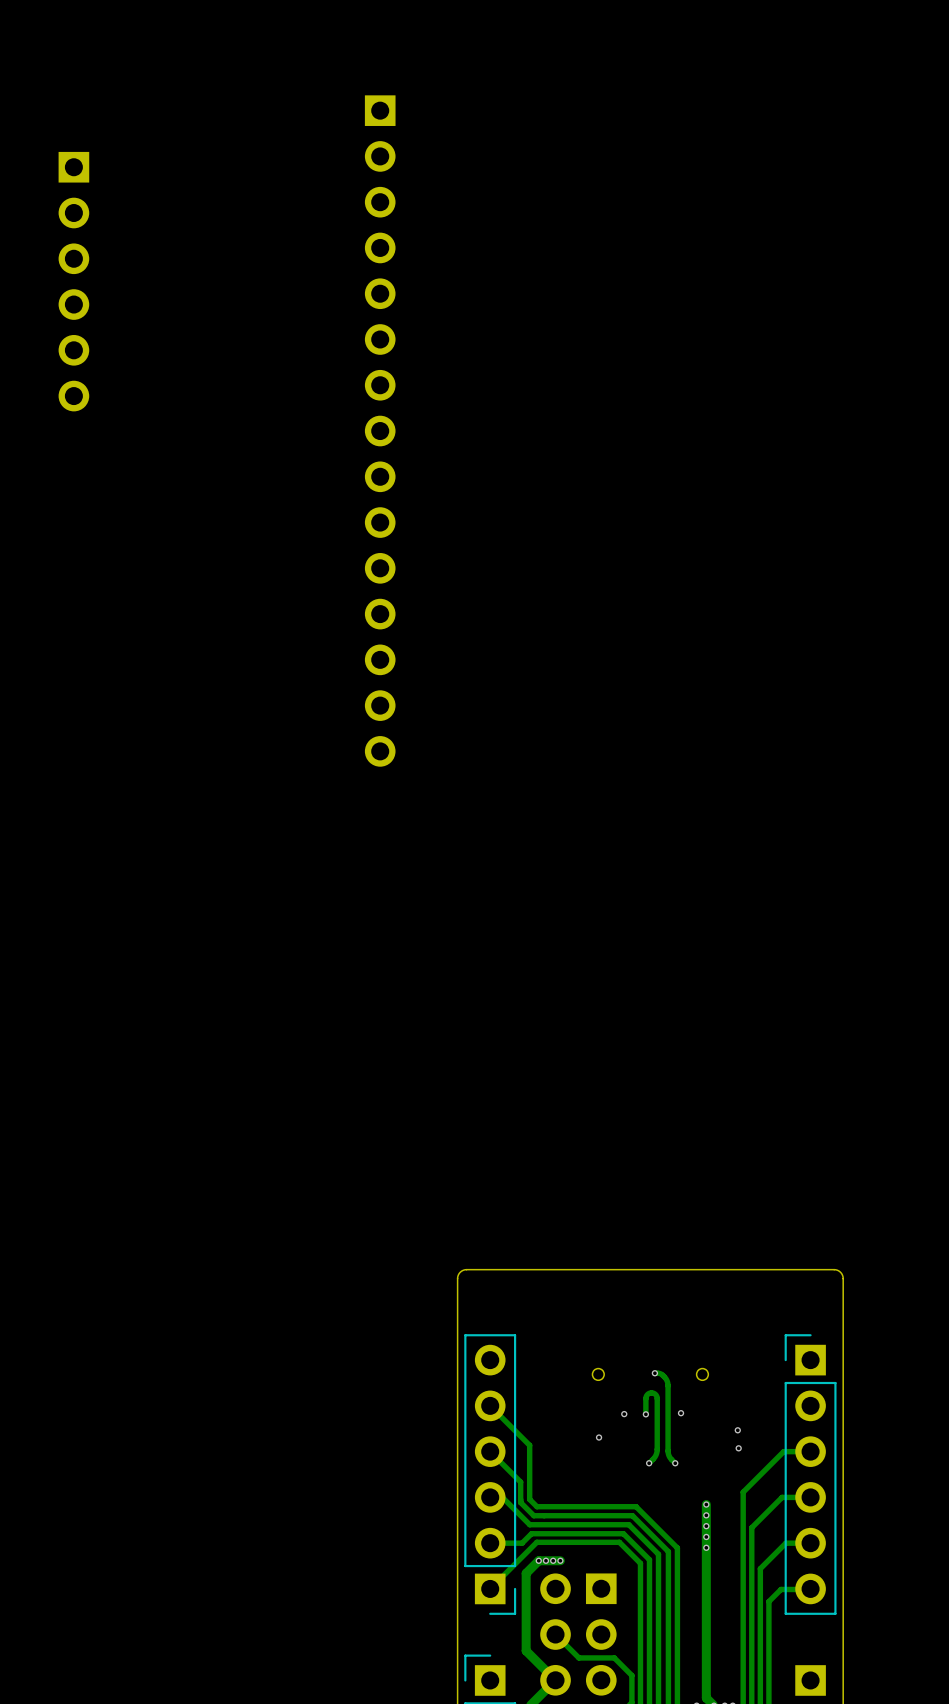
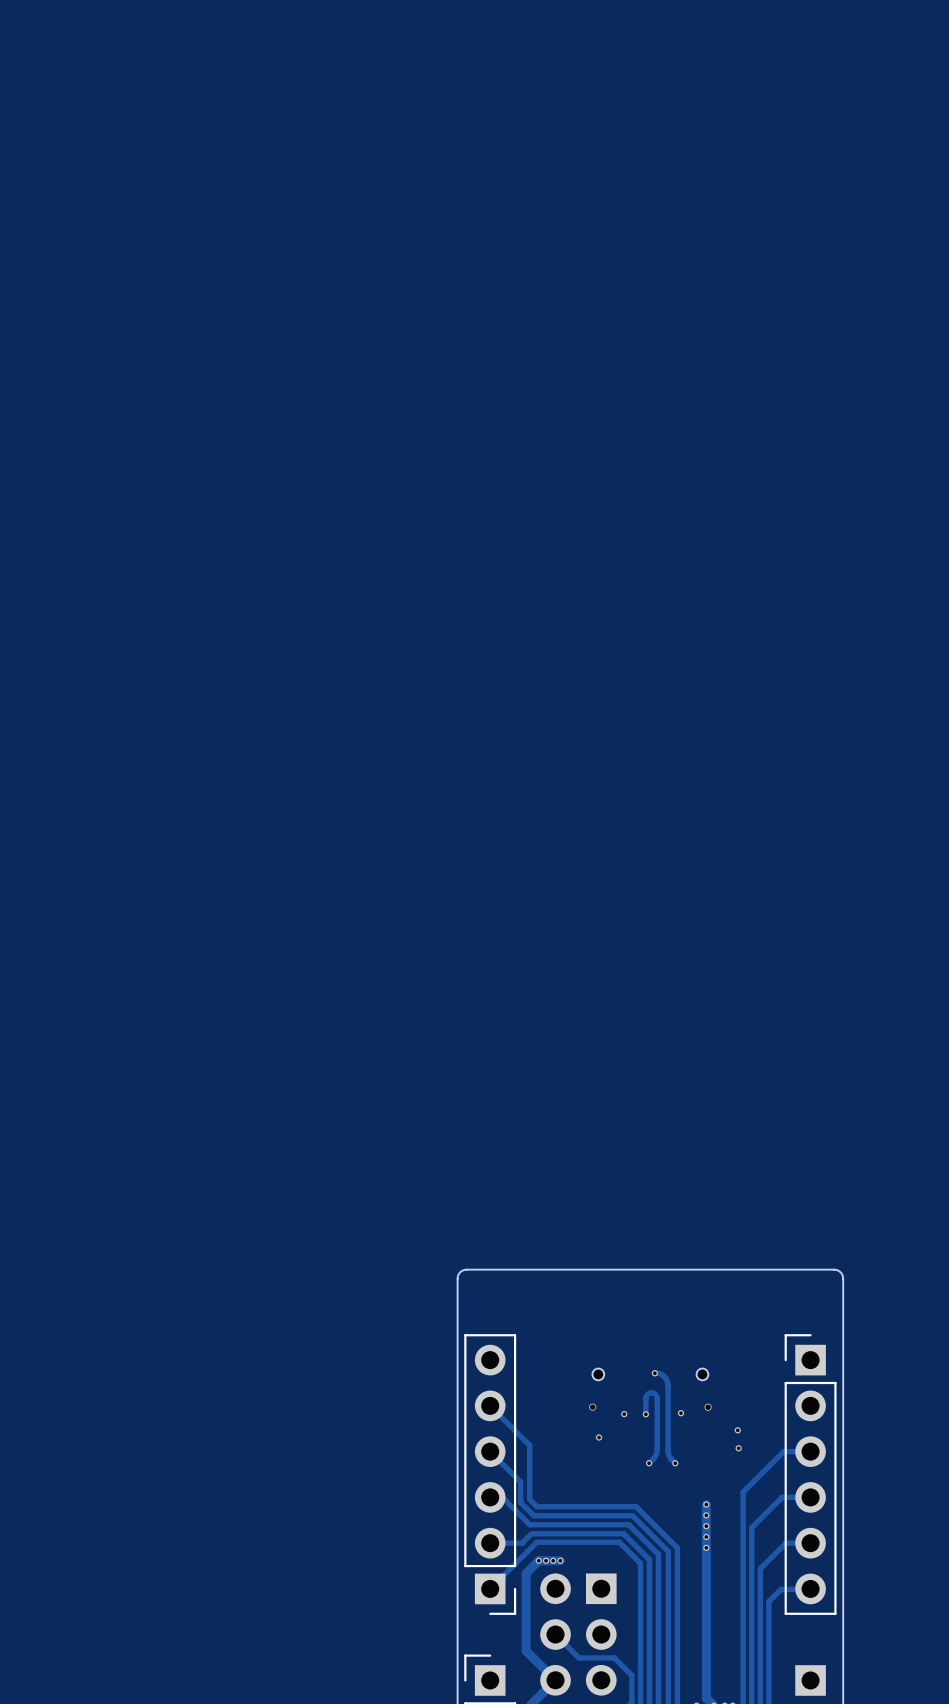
part: (73, 281) -> none
part: (380, 431) -> none
via: none -> (592, 1407)
via: none -> (708, 1407)

